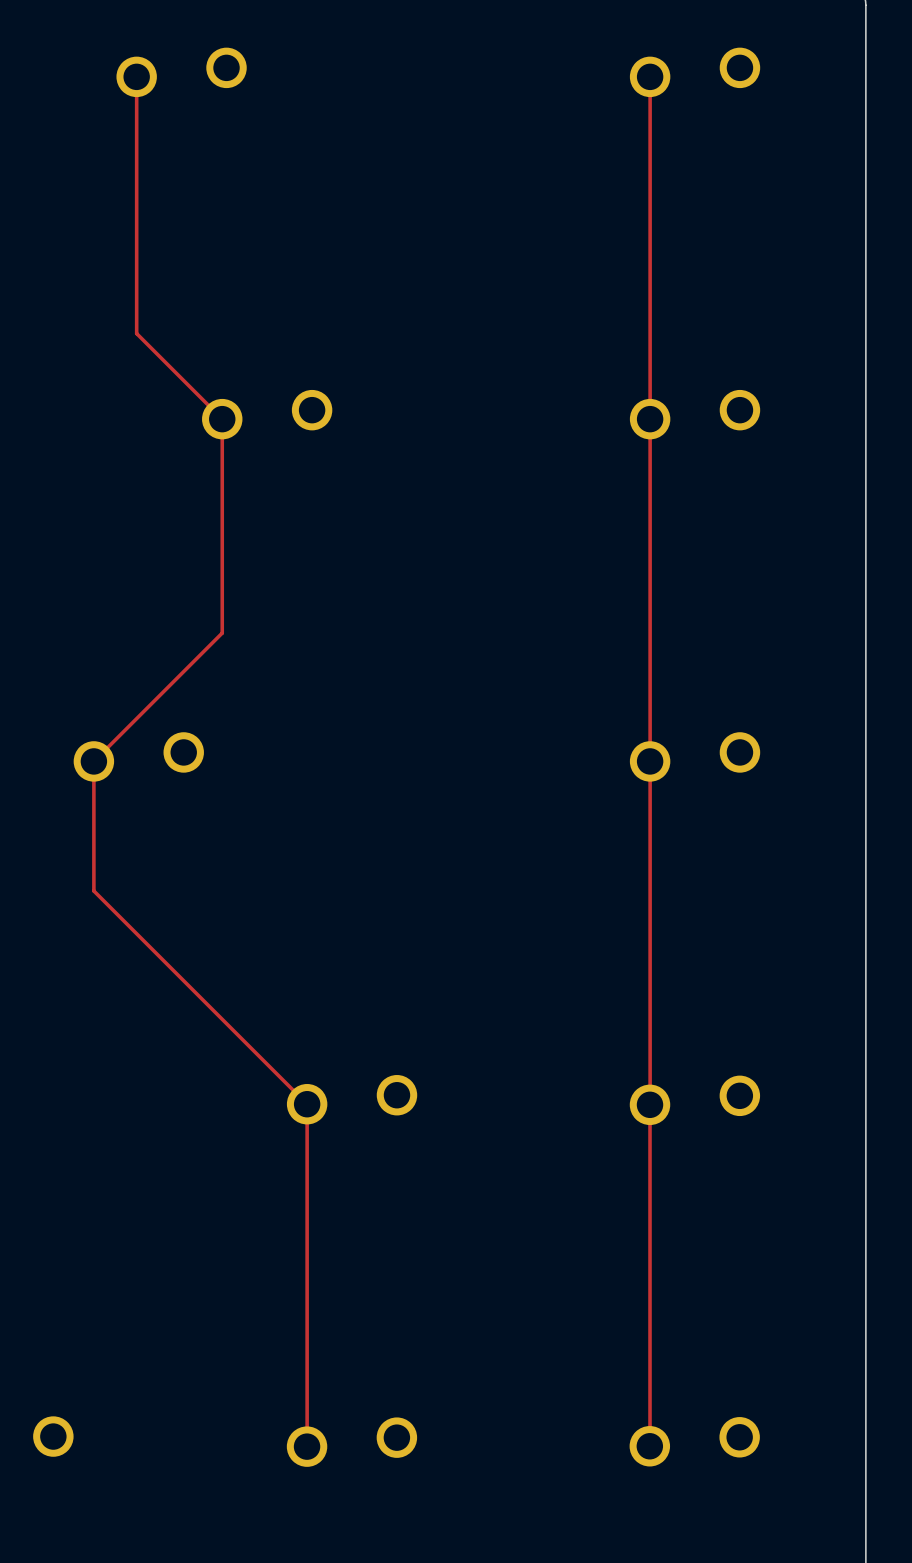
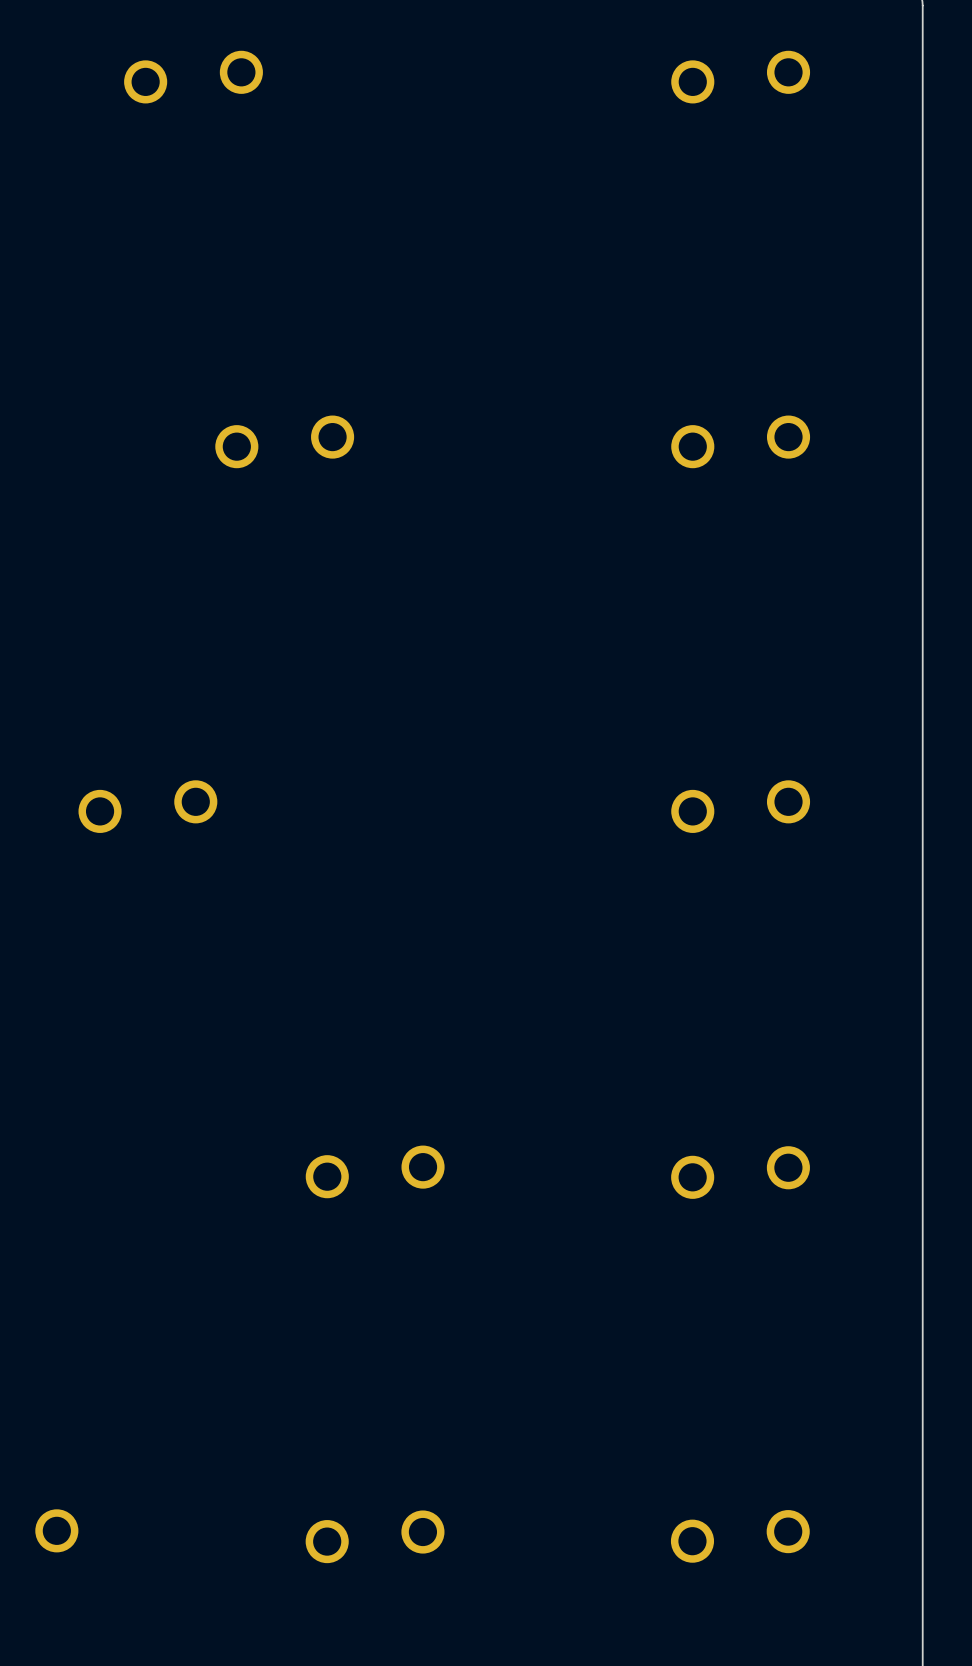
track: (136, 76) (136, 333) (222, 419) (222, 633) (93, 761) (93, 890) (307, 1104) (307, 1446) -> none
track: (650, 76) (650, 1104) -> none
track: (650, 1104) (650, 1446) -> none

